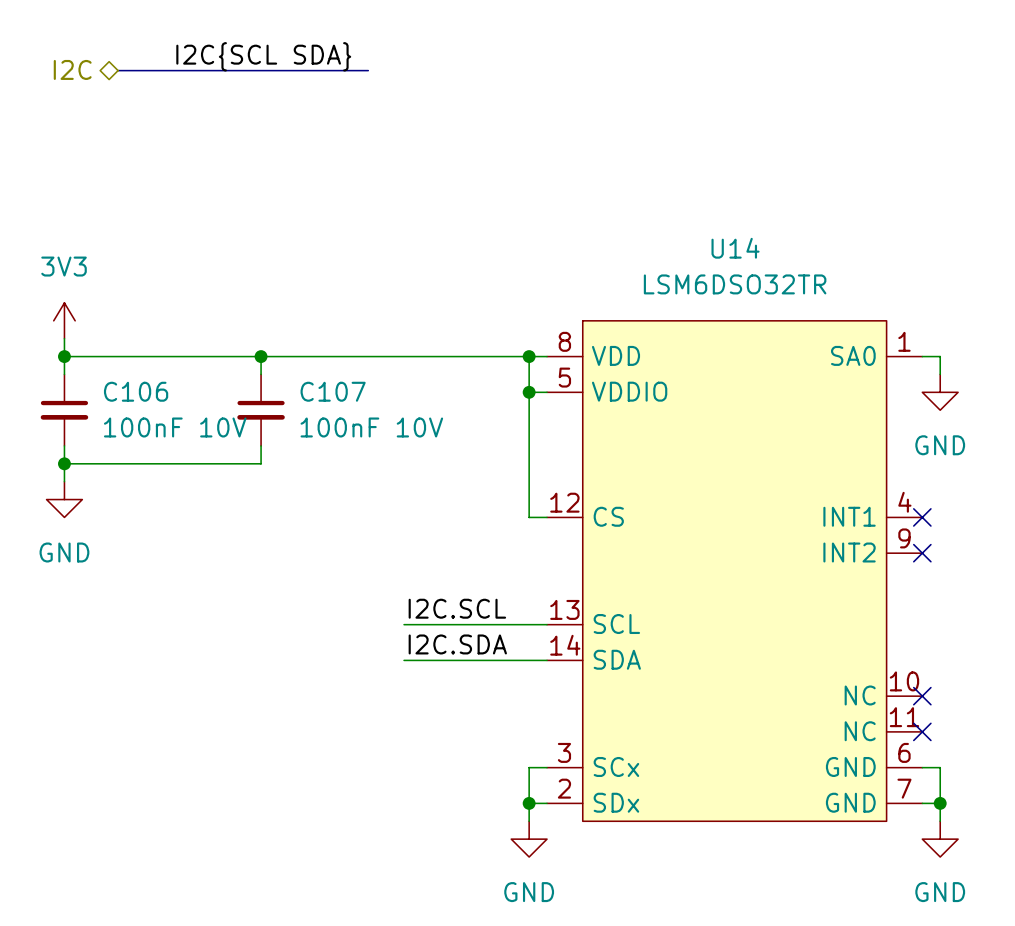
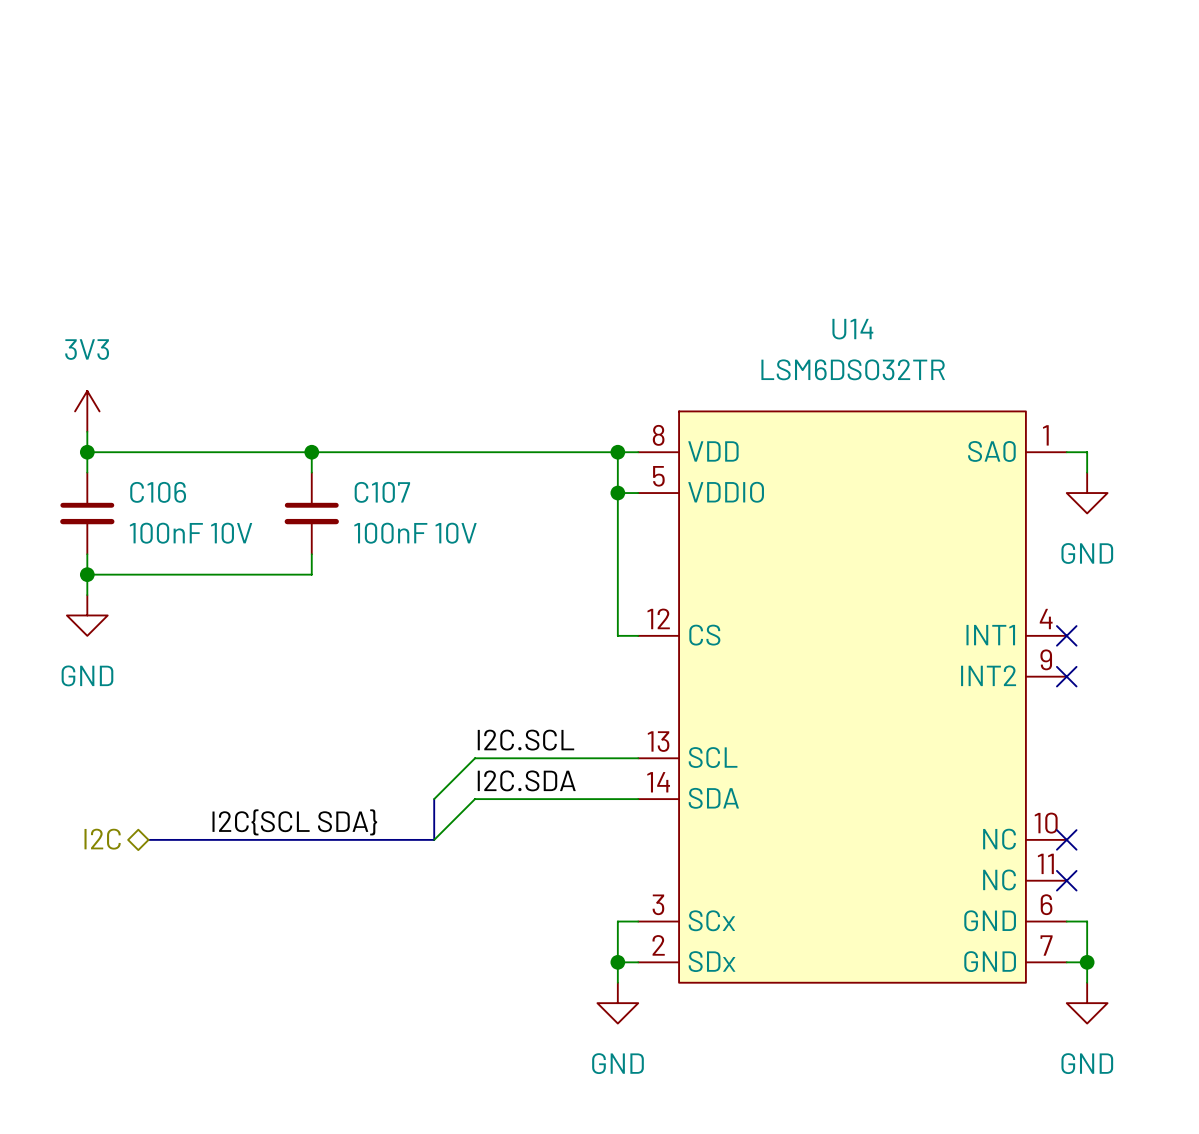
label: I2C{SCL SDA} (263, 56) -> none
hierarchical label: I2C (72, 69) -> none
bus: (118, 70) (368, 70) -> none
wire: none -> (475, 758) (434, 799)
bus: none -> (434, 799) (434, 839) (148, 839)
wire: none -> (475, 799) (434, 839)
label: none -> I2C{SCL SDA} (294, 822)
hierarchical label: none -> I2C (102, 839)

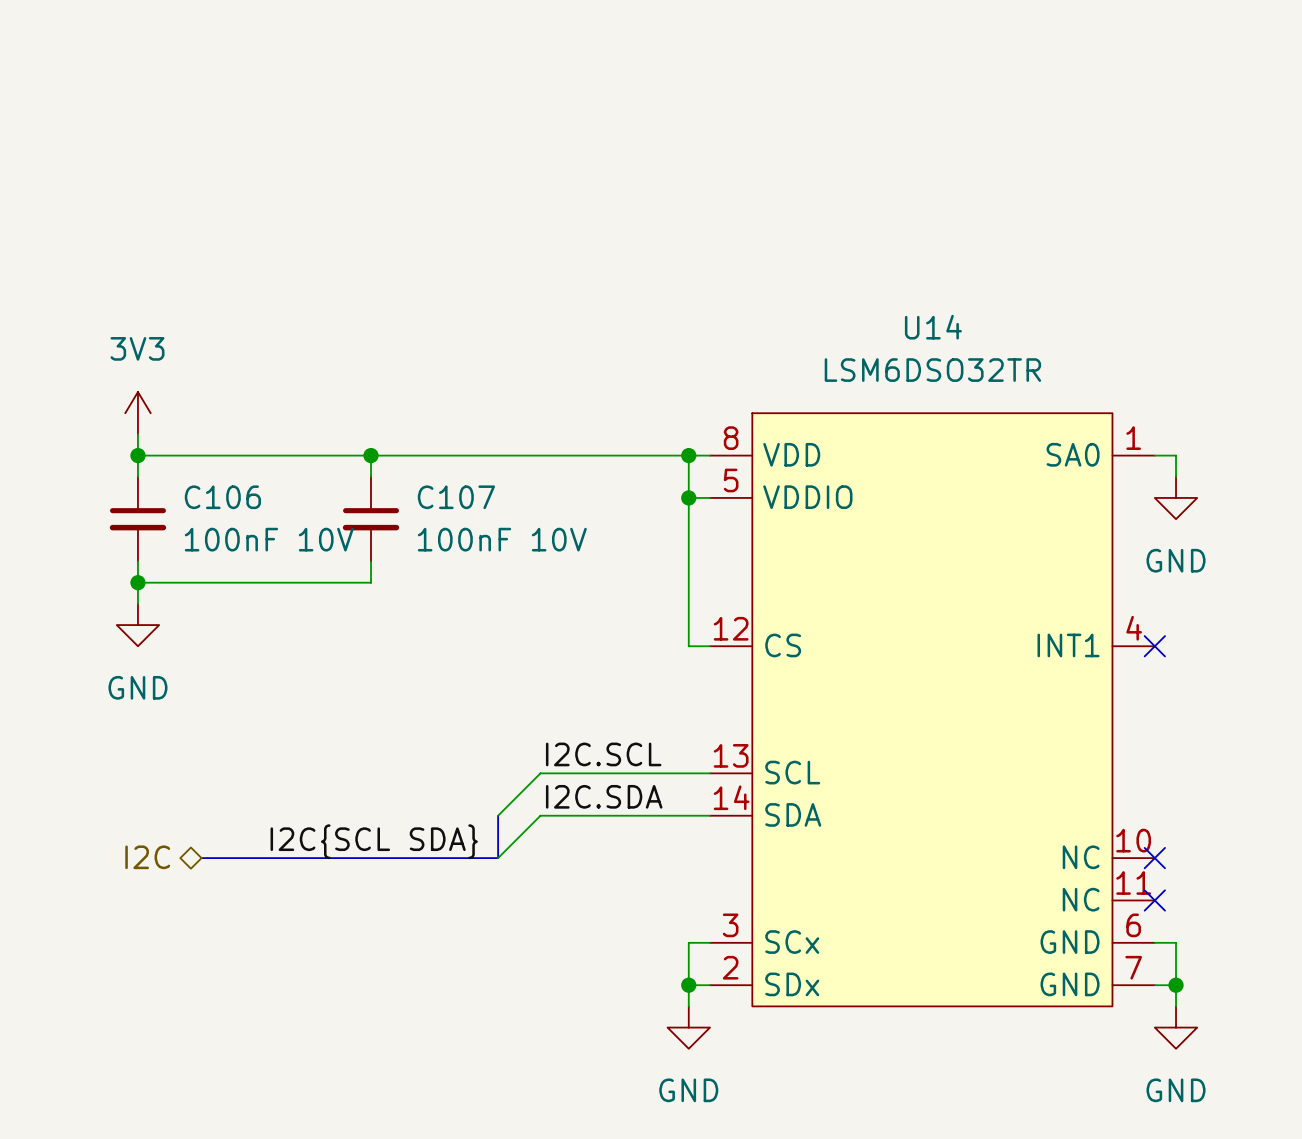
U14 symbol: [638, 411, 1067, 983] -> [709, 413, 1155, 1007]
no-connect mark: (1066, 676) -> none

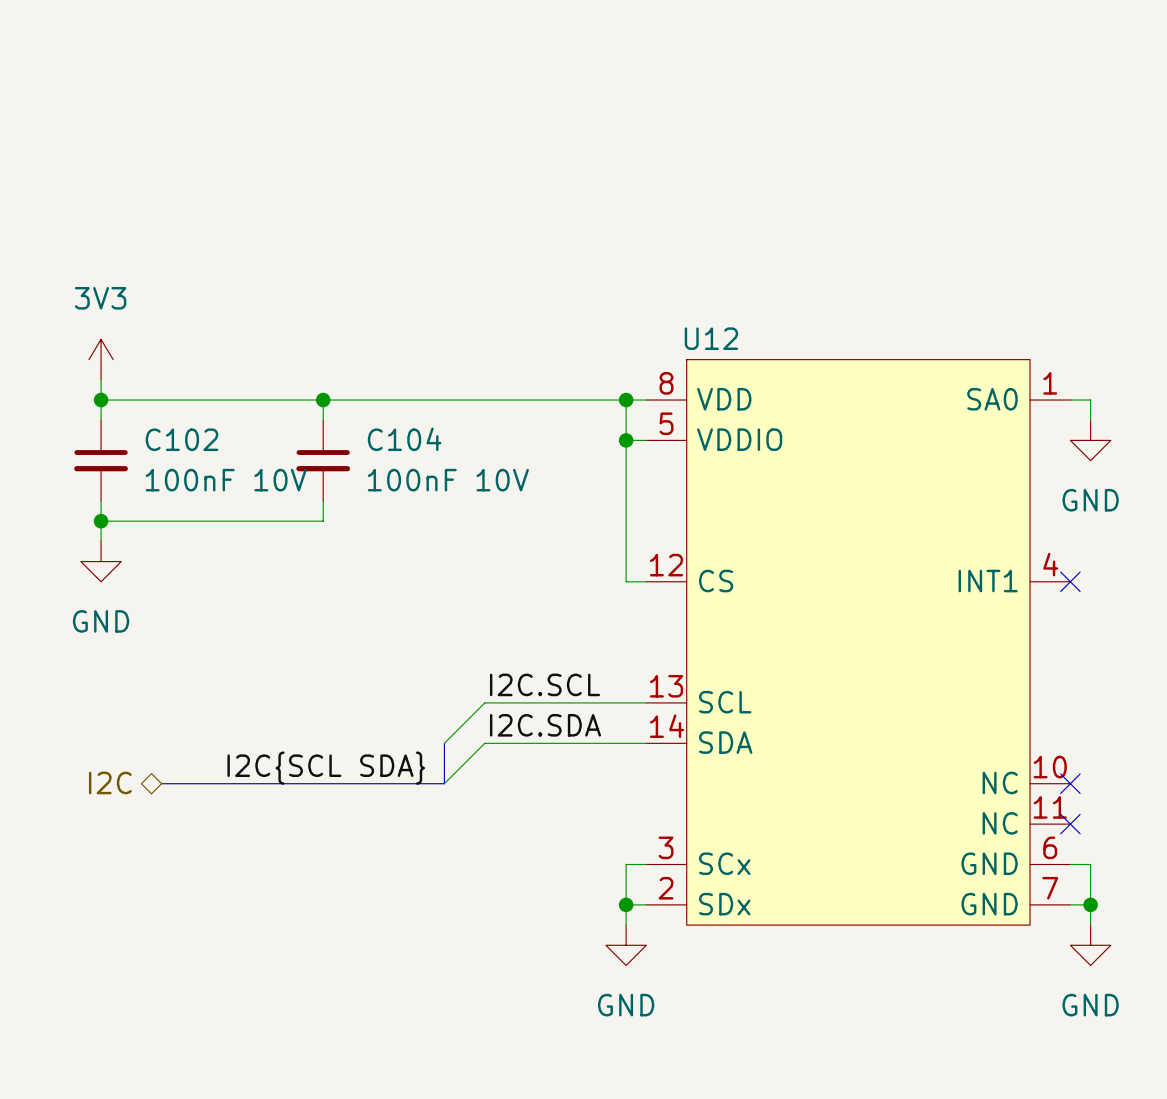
U14 name: U14 (933, 327) -> U12 (711, 338)
U14 value: LSM6DSO32TR (932, 370) -> none
C106 name: C106 (222, 497) -> C102 (181, 439)
C107 name: C107 (456, 497) -> C104 (404, 439)

